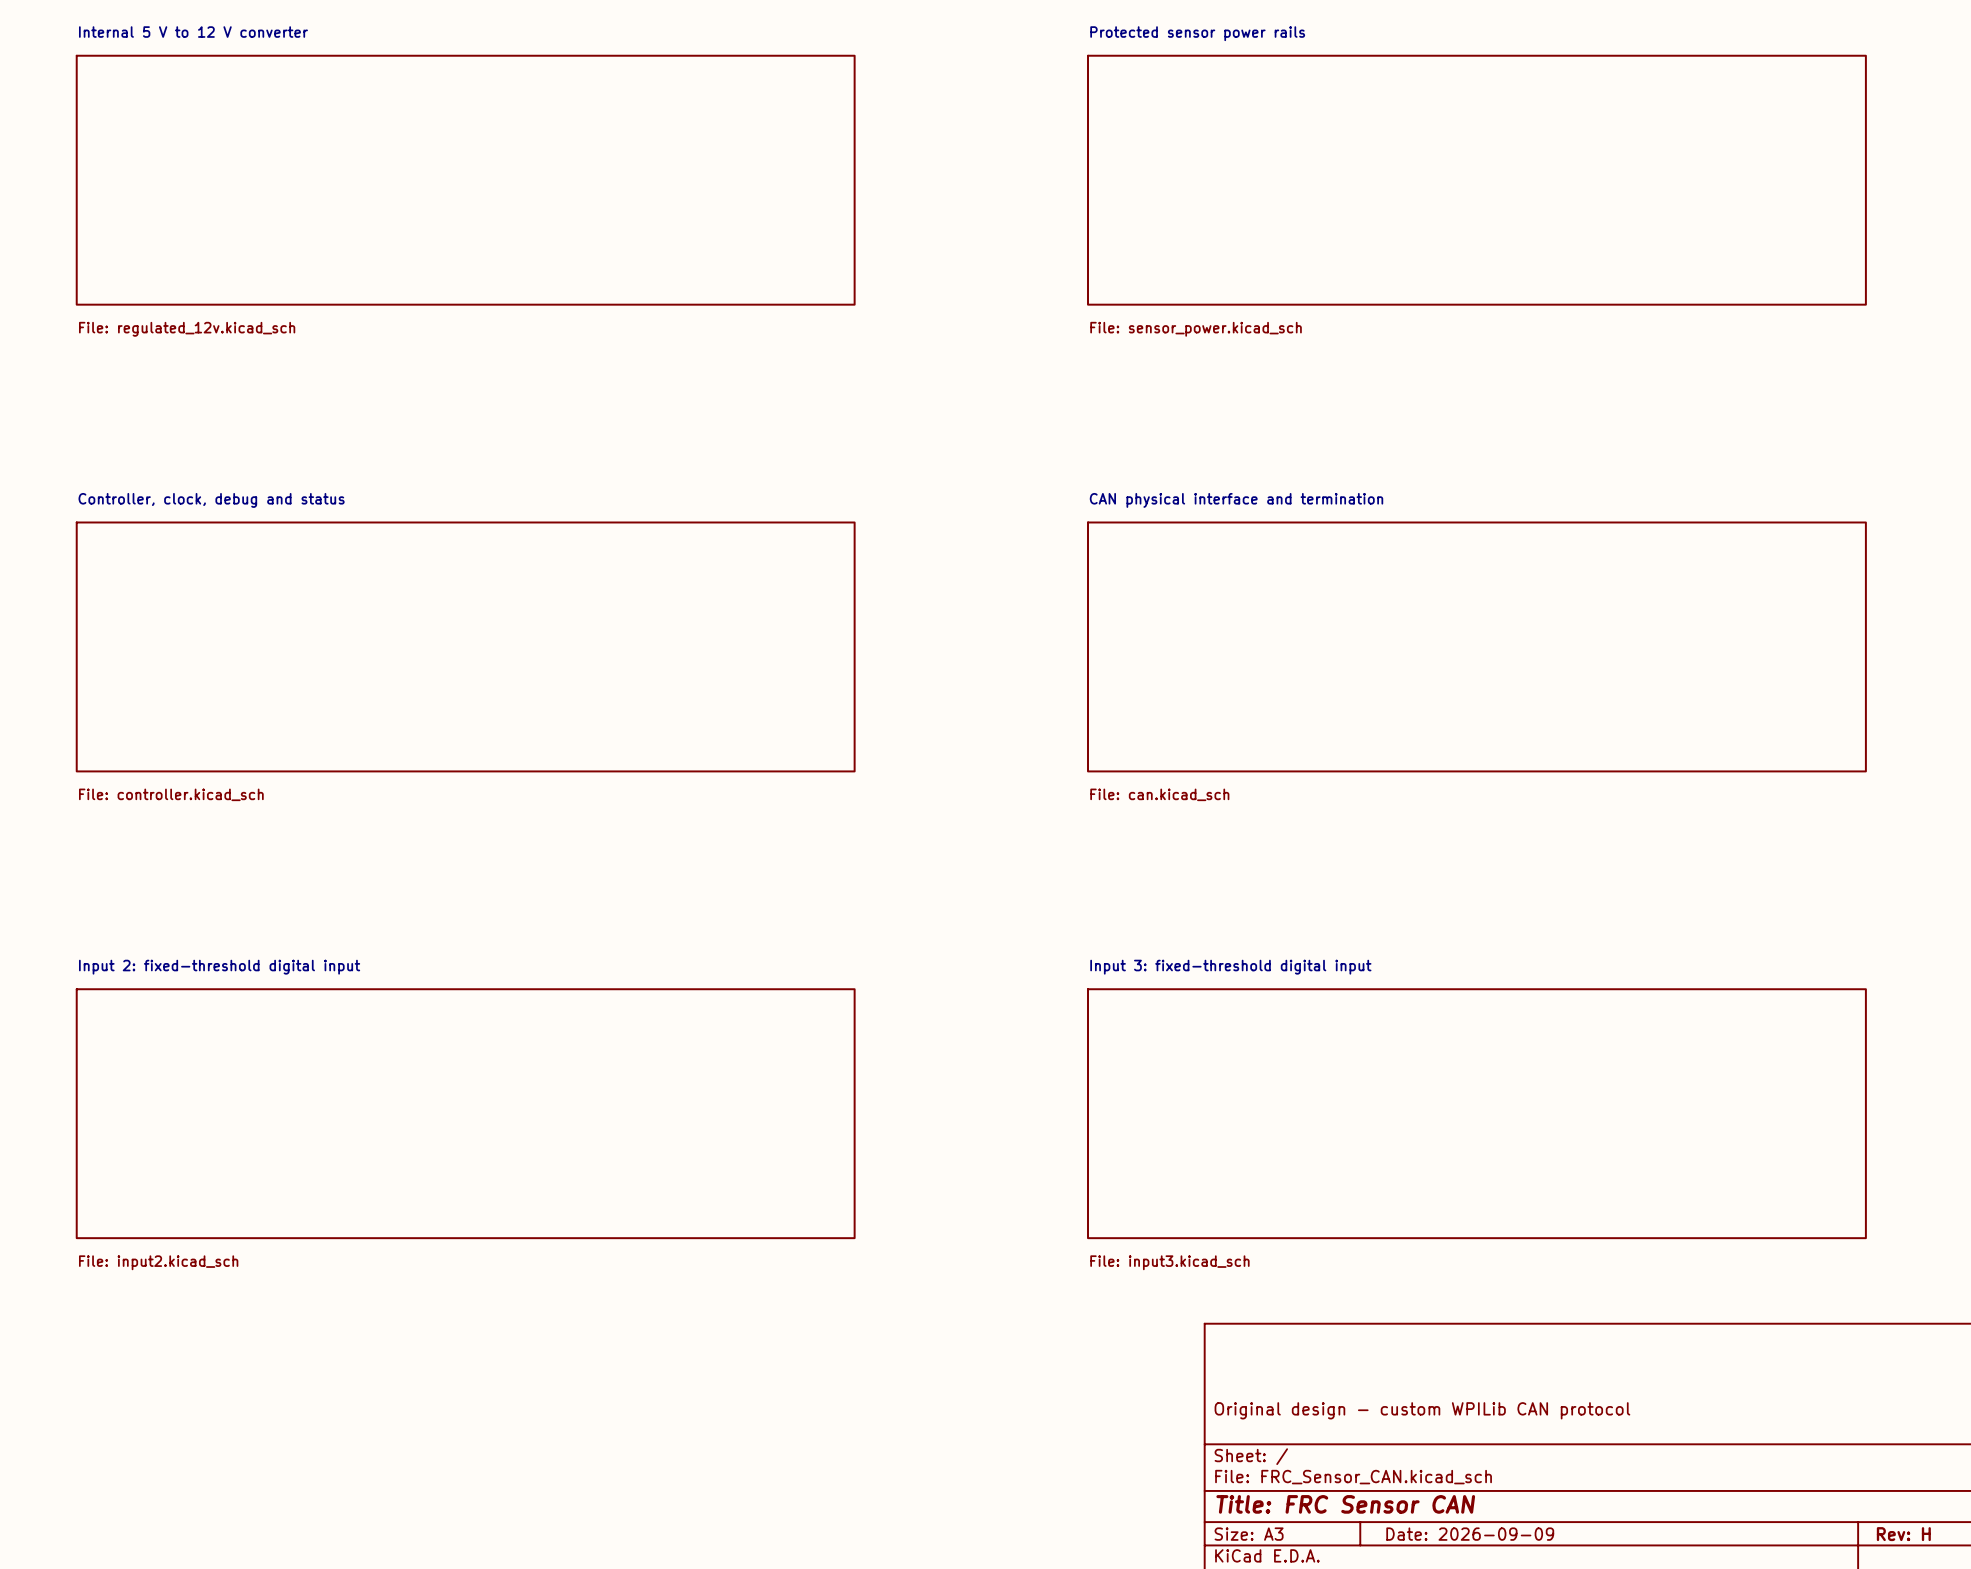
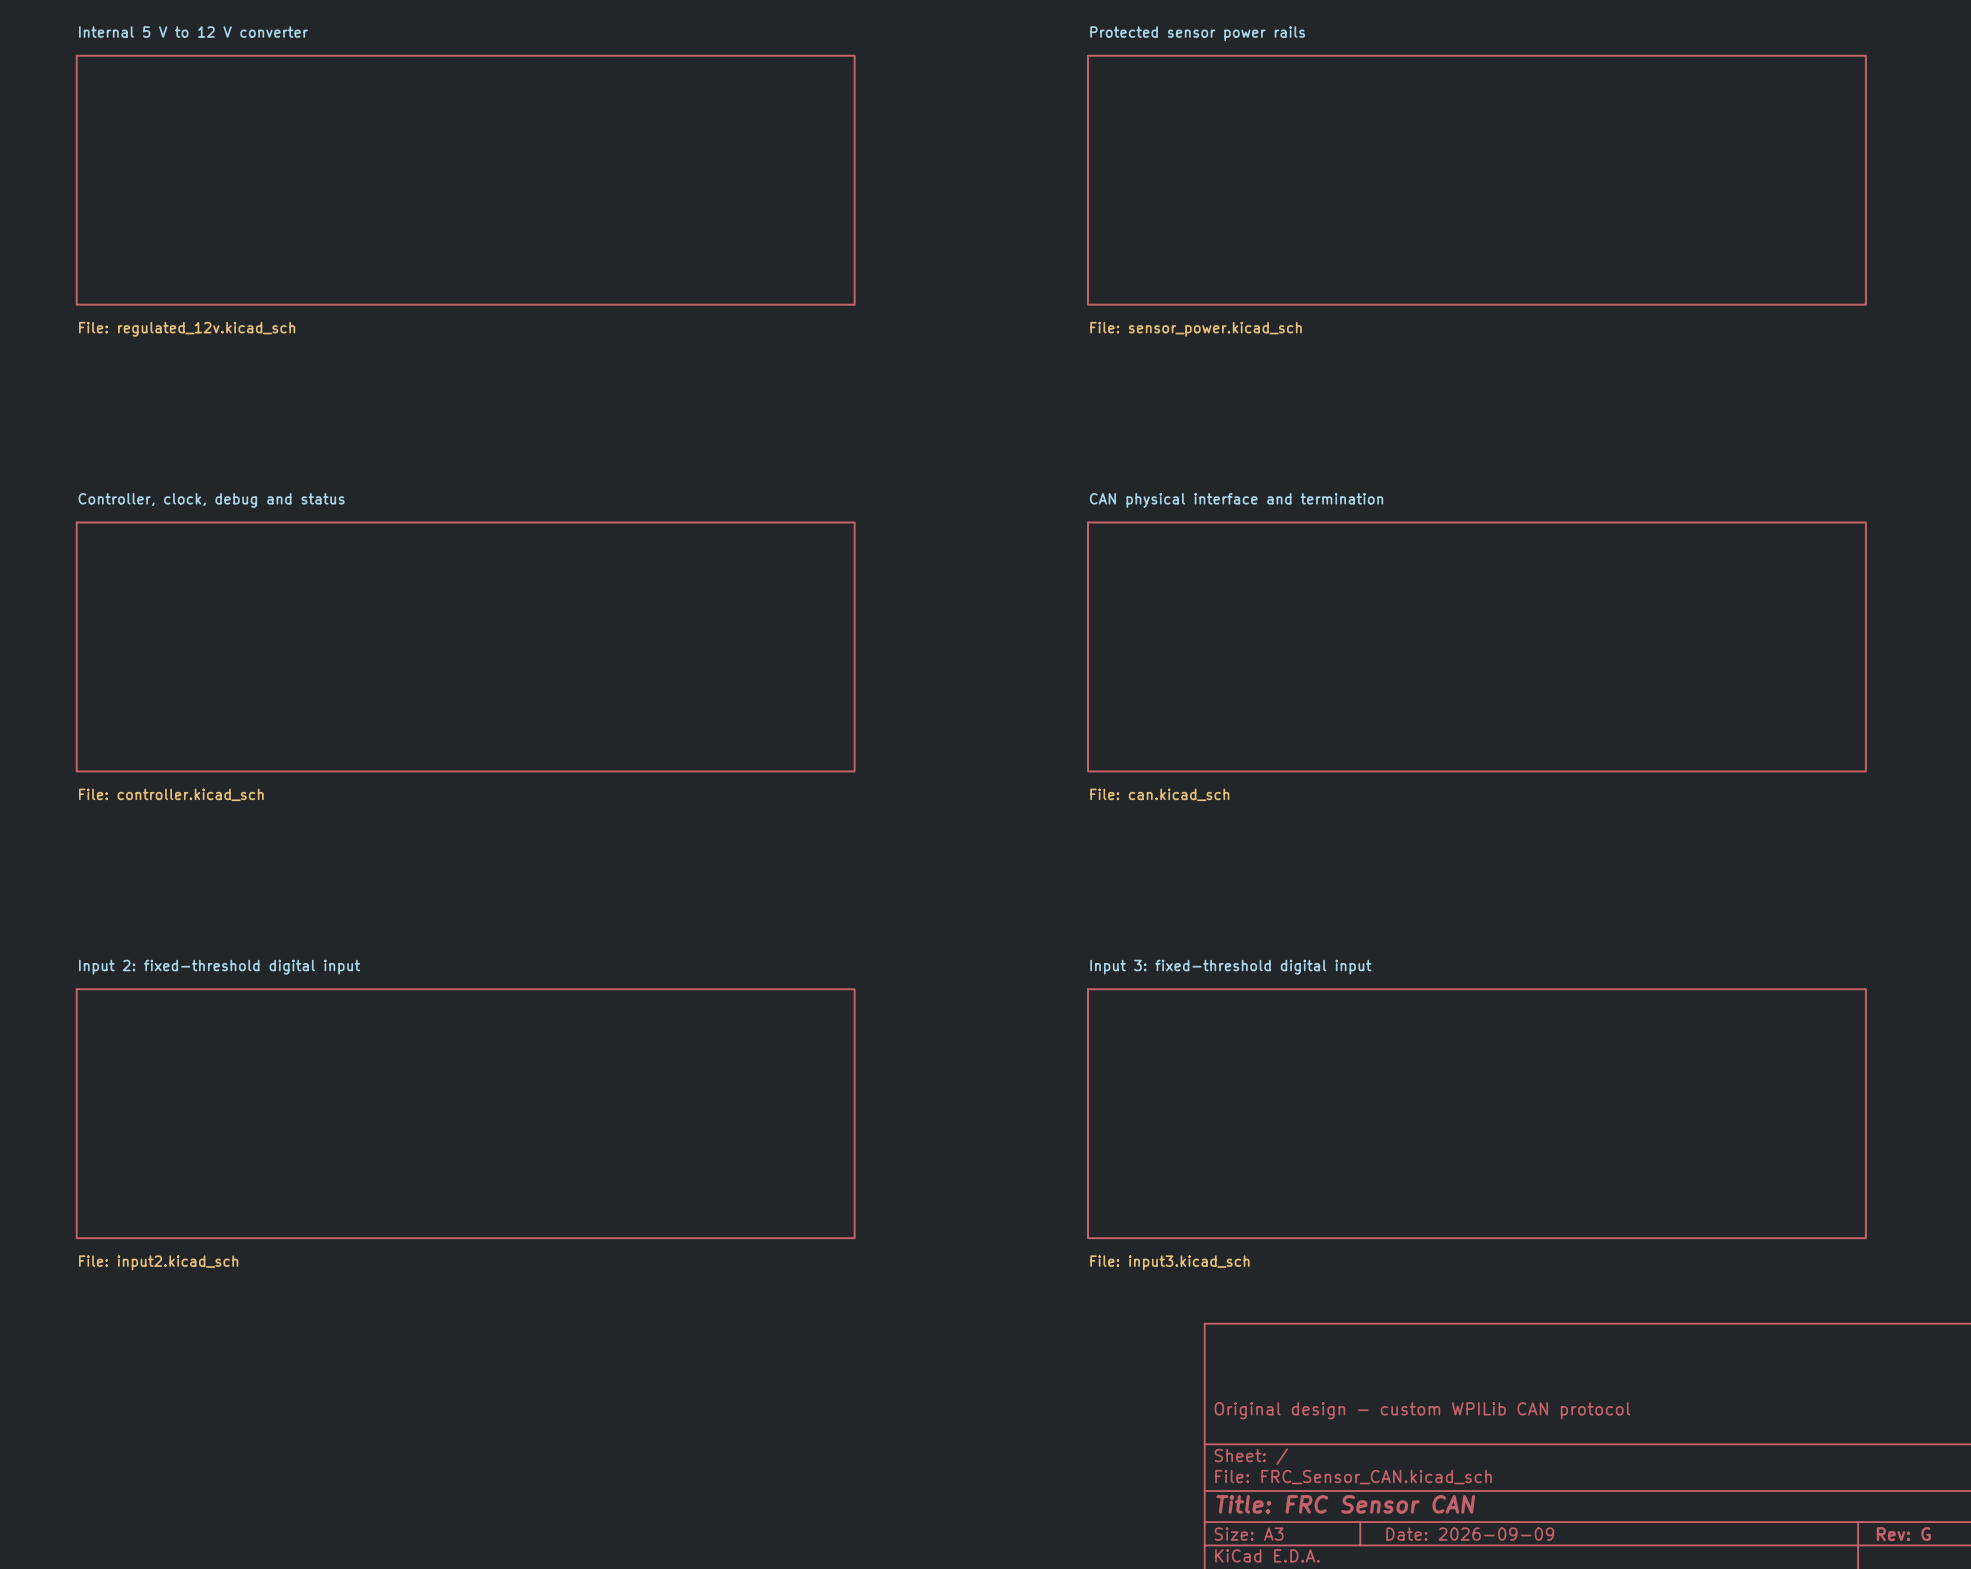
title block: Rev: H (1903, 1534) -> Rev: G (1903, 1534)

